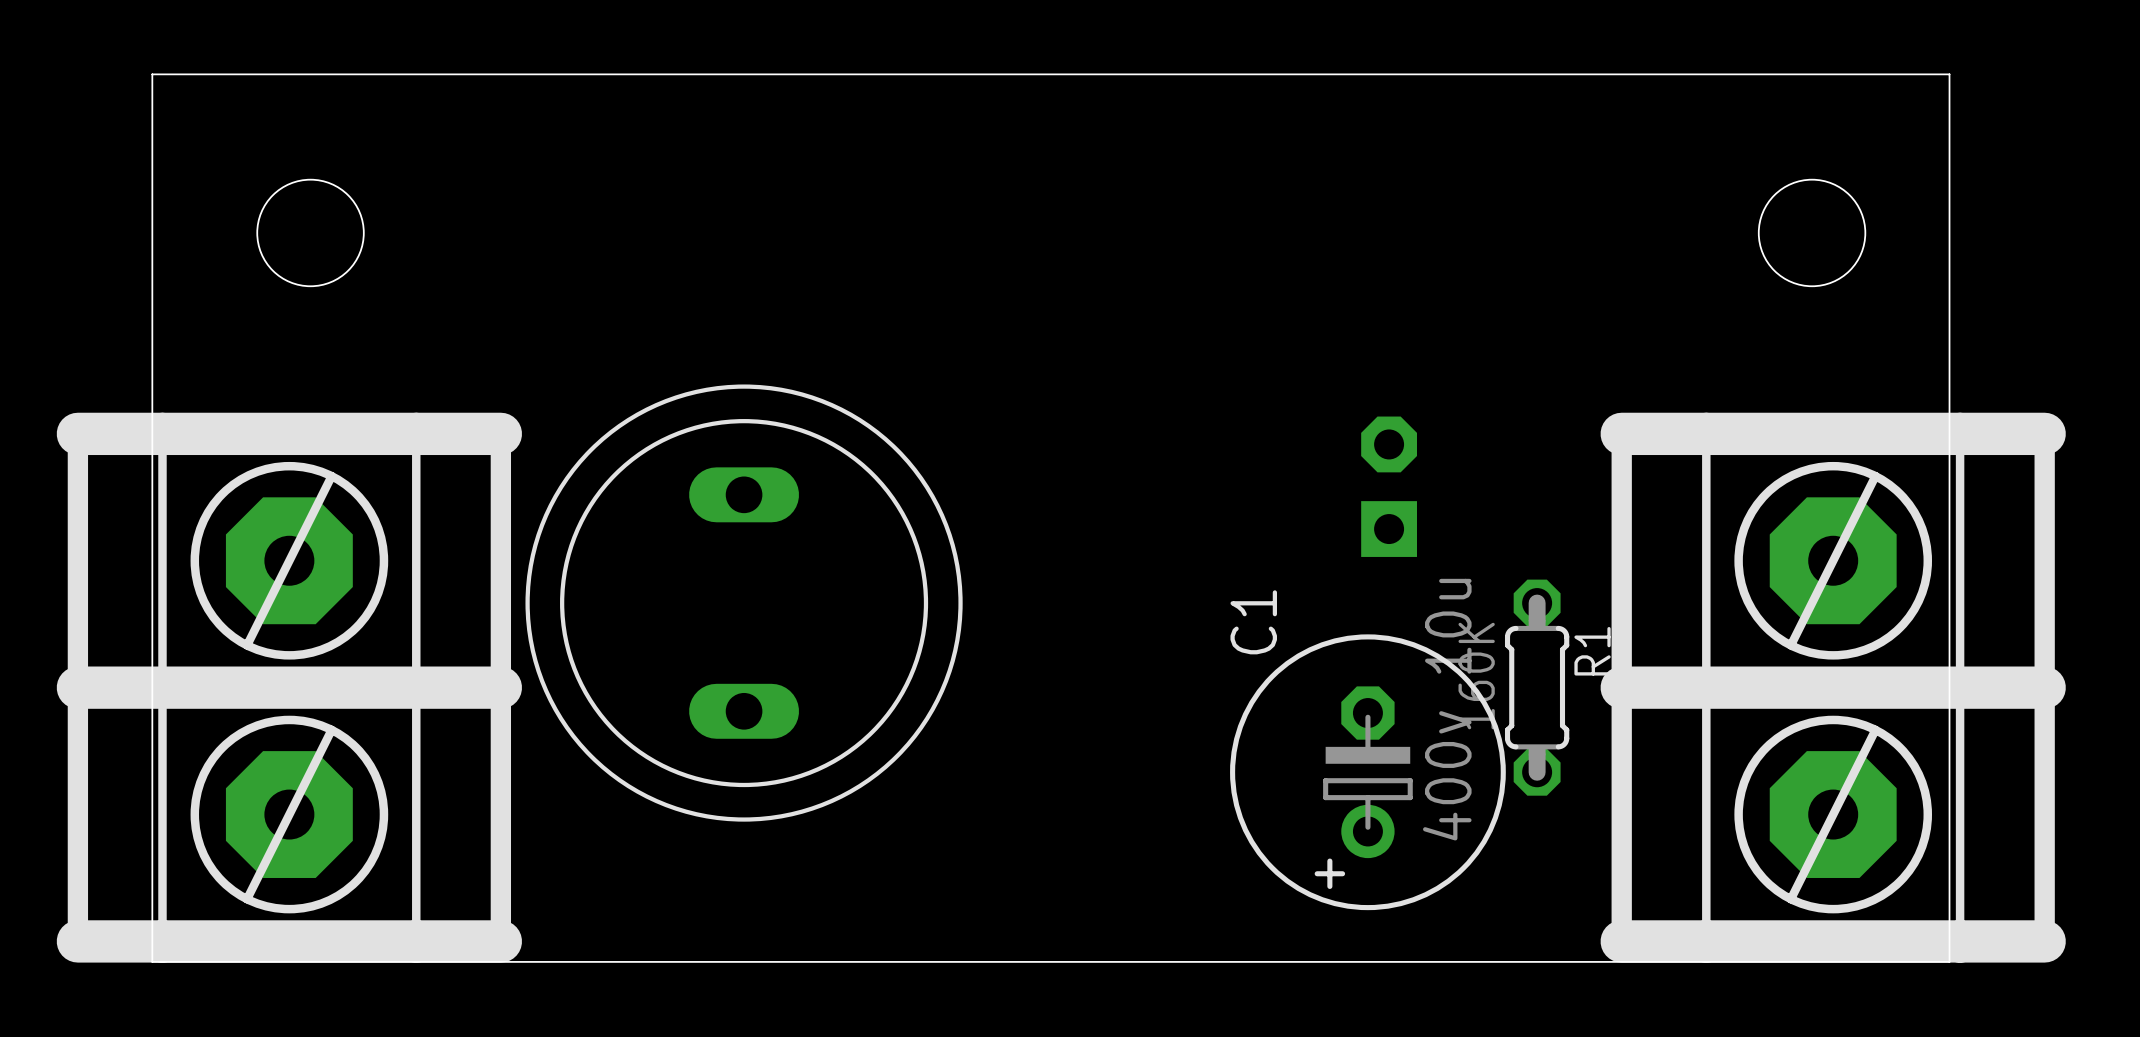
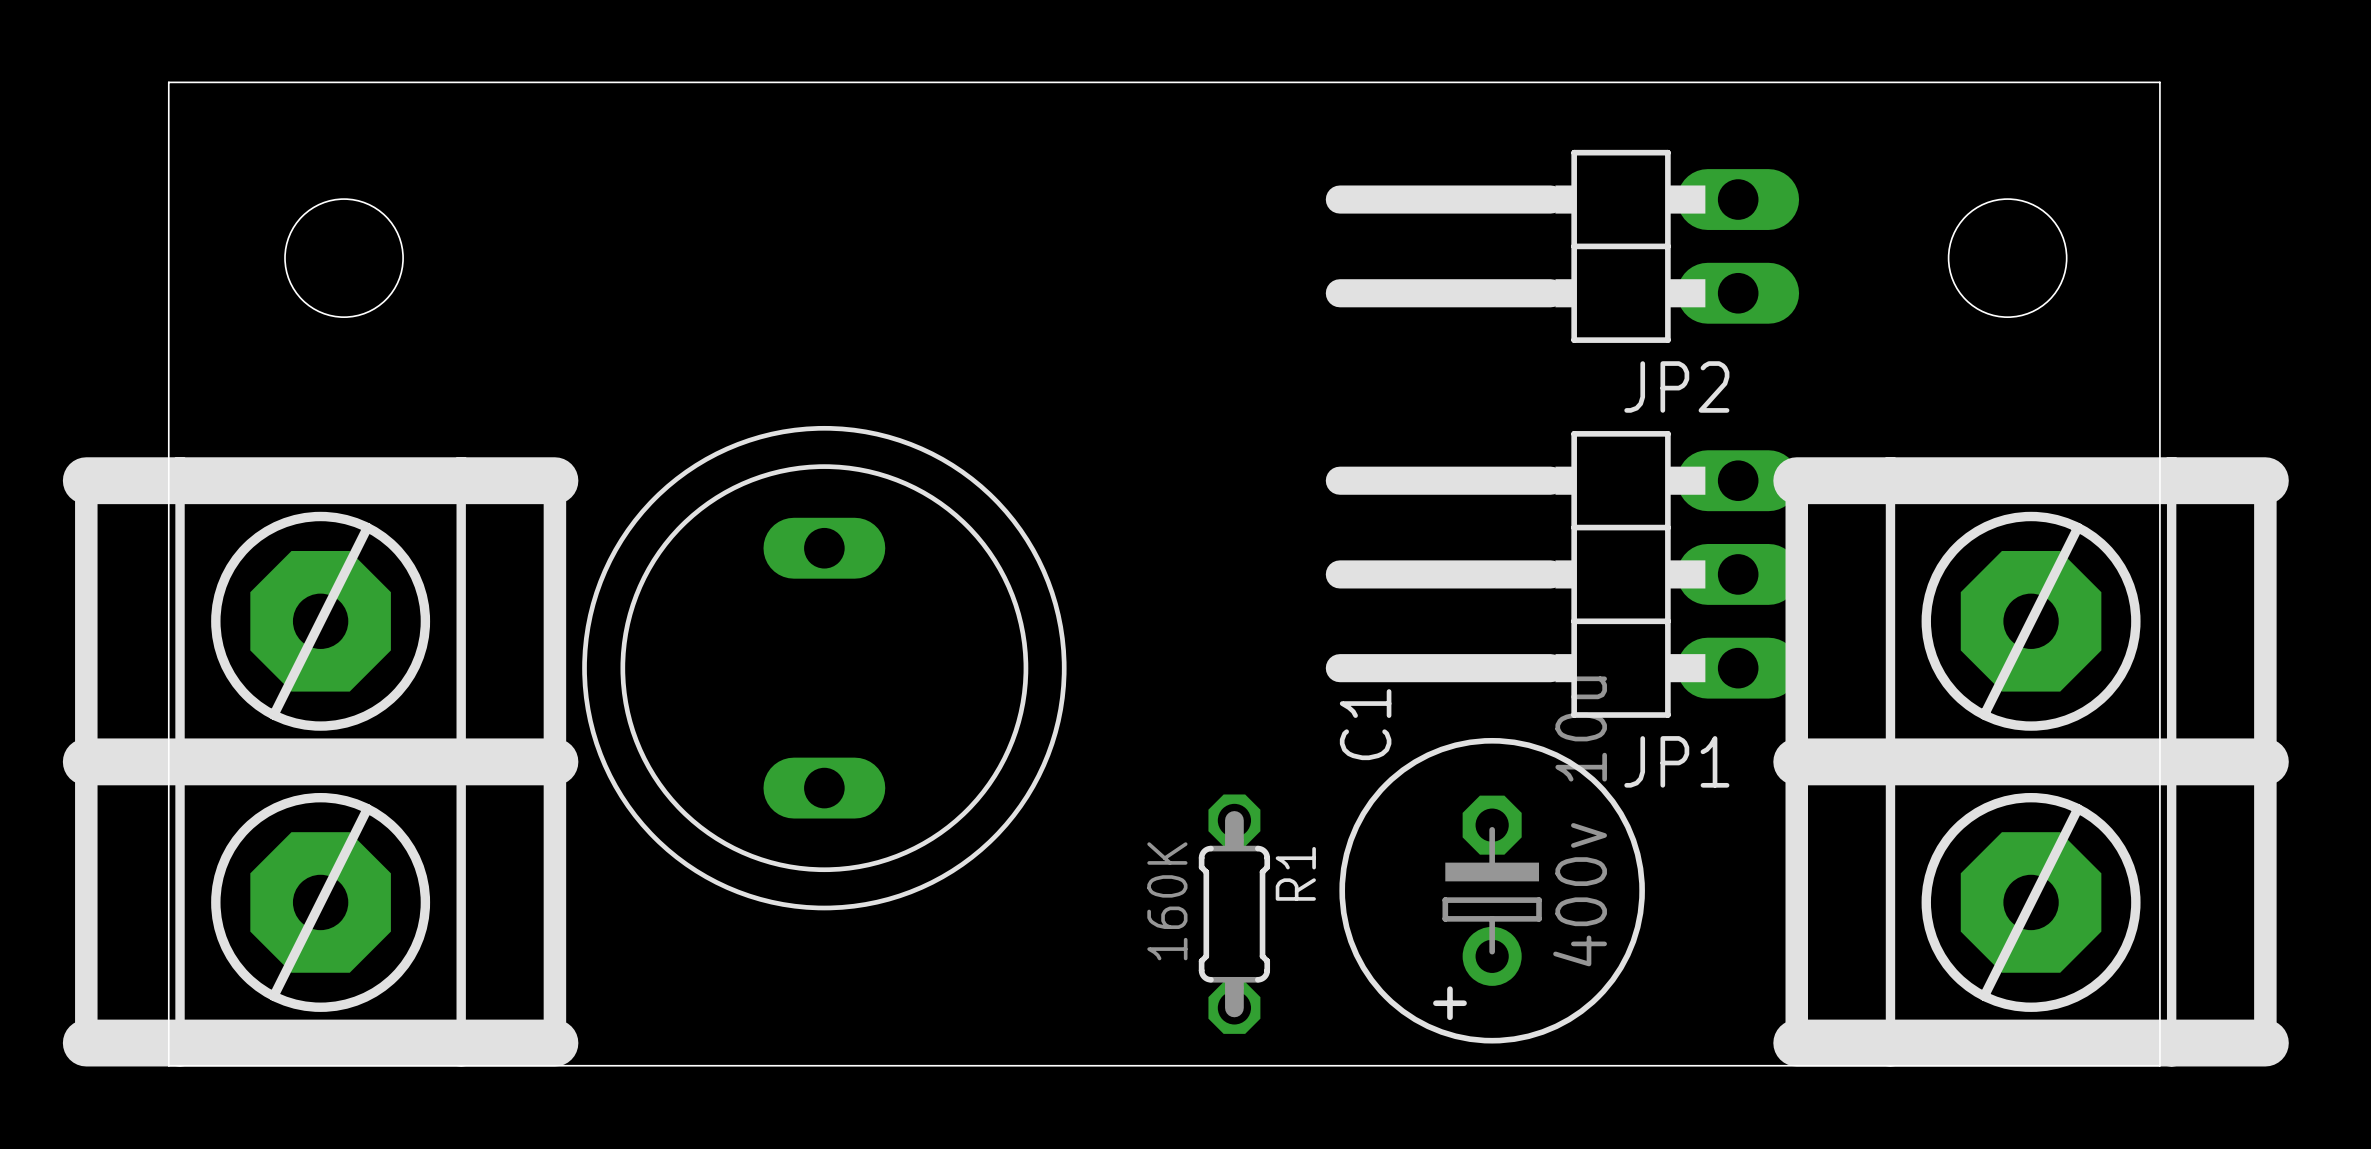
JP2: none -> (1562, 246)
part: (1389, 486) -> none
JP1: none -> (1562, 574)
R1 position: (1537, 687) -> (1234, 914)
C1 position: (1367, 772) -> (1492, 890)

